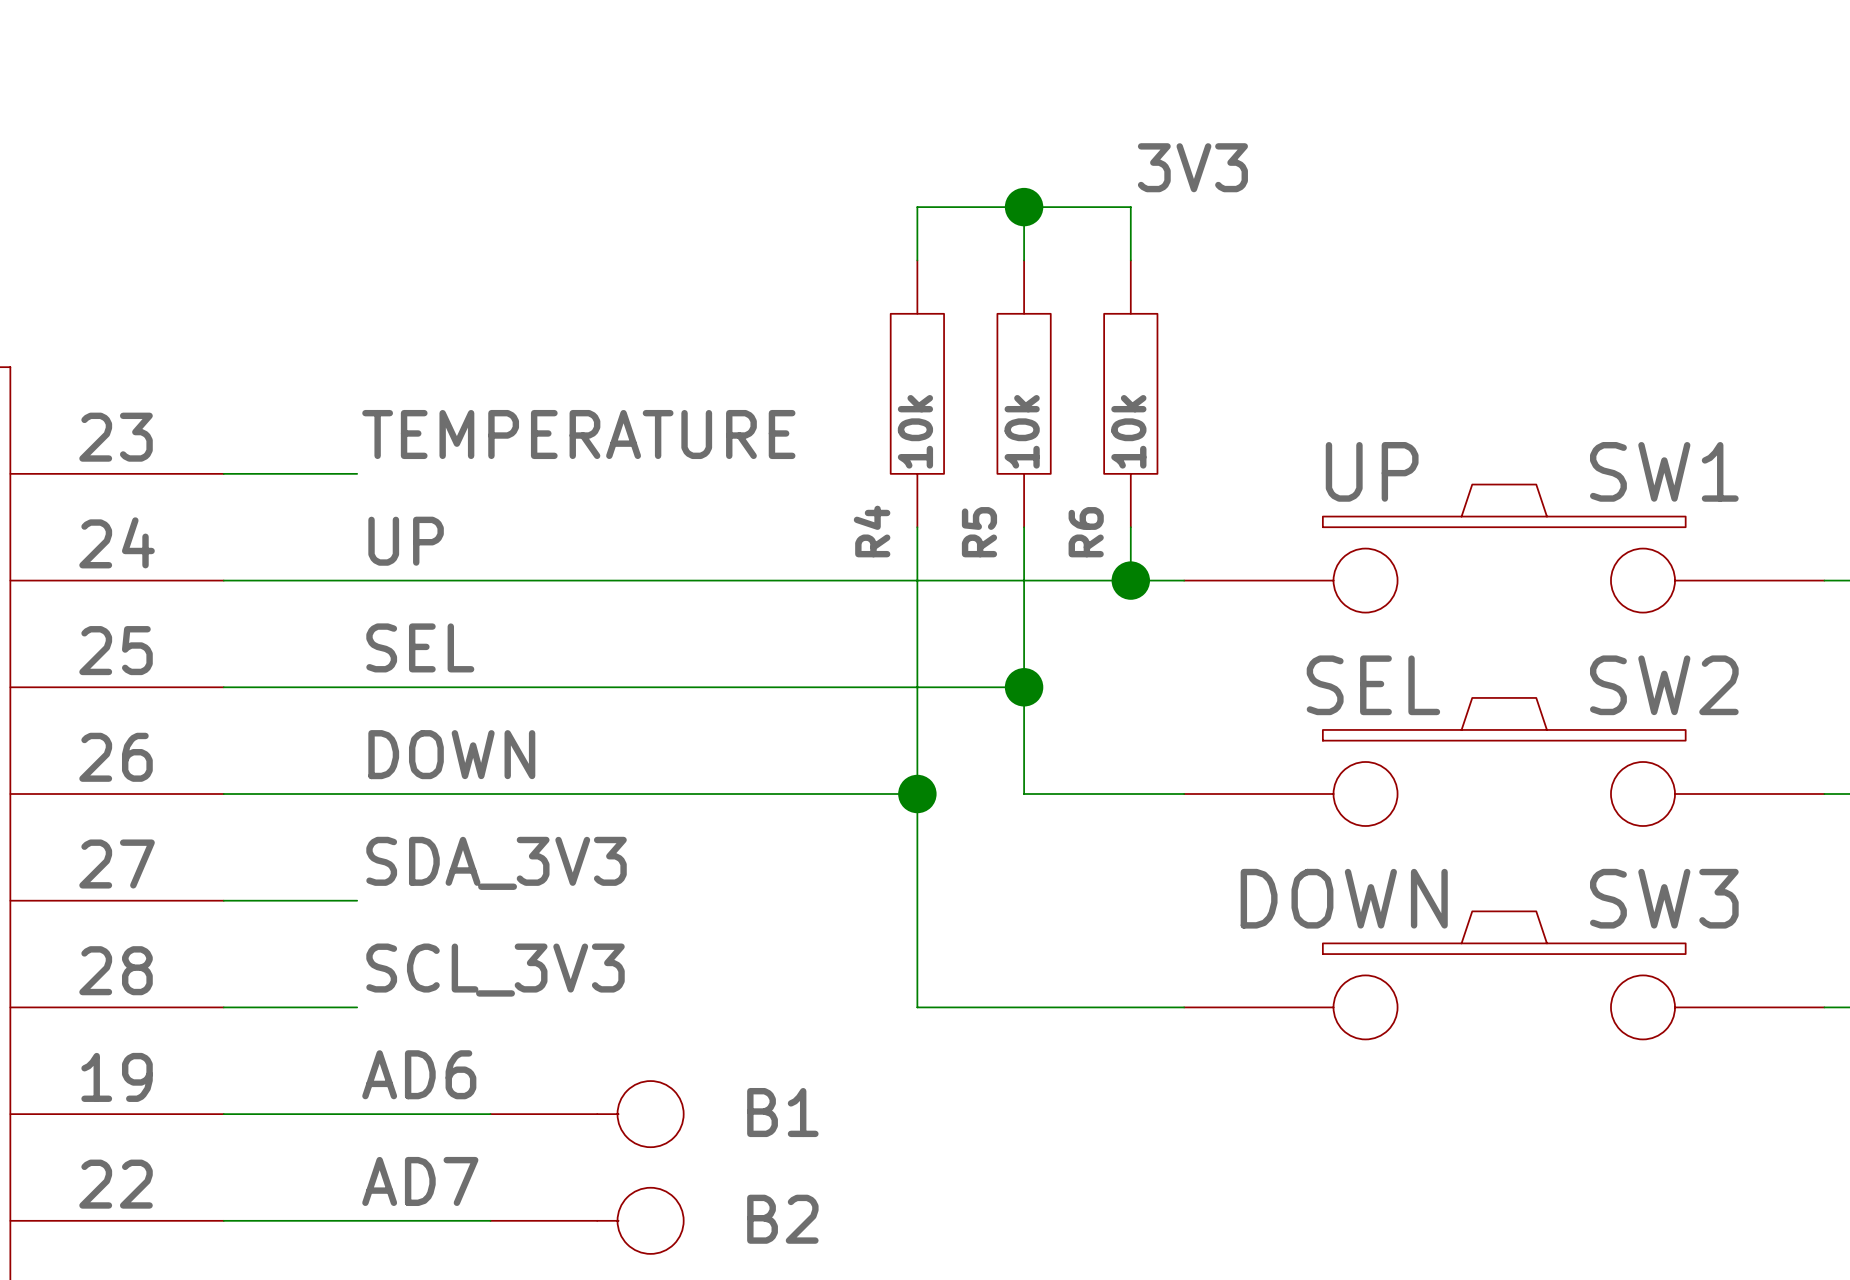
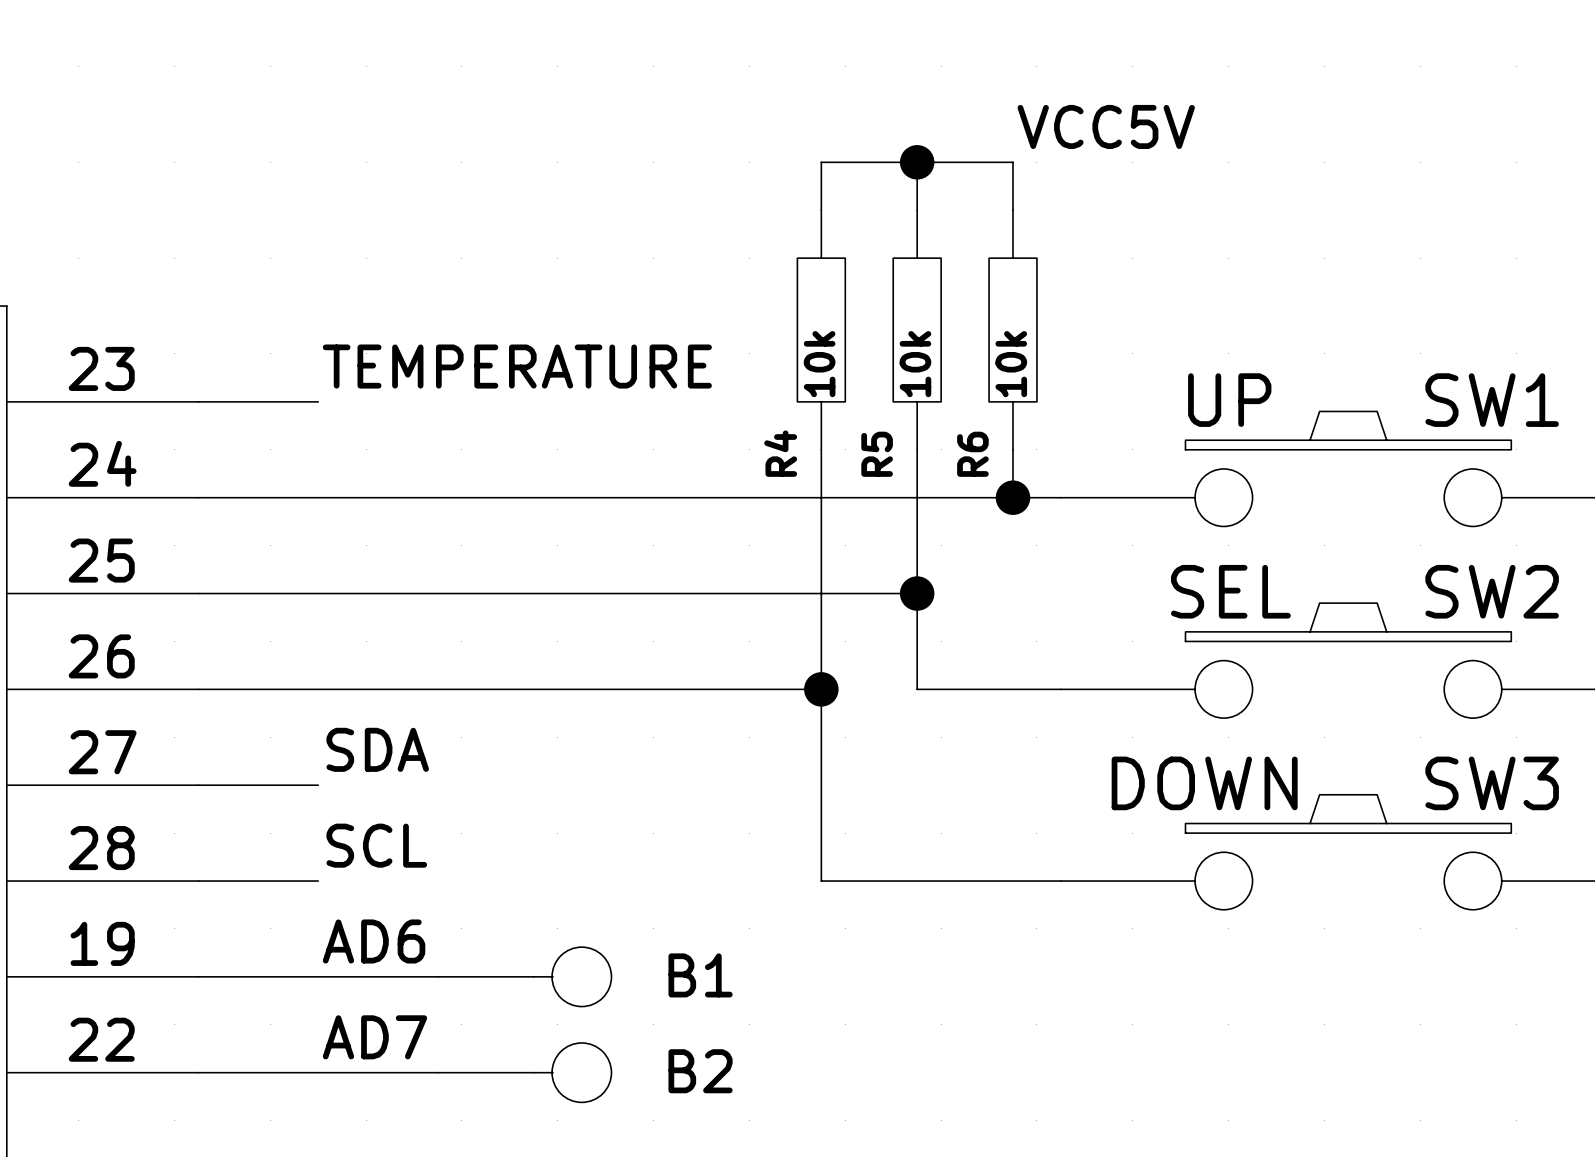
label: 3V3 (1192, 167) -> VCC5V (1106, 126)
label: UP (406, 541) -> none
label: SEL (420, 647) -> none
label: DOWN (451, 754) -> none
label: SDA_3V3 (496, 863) -> SDA (377, 749)
label: SCL_3V3 (495, 970) -> SCL (376, 845)

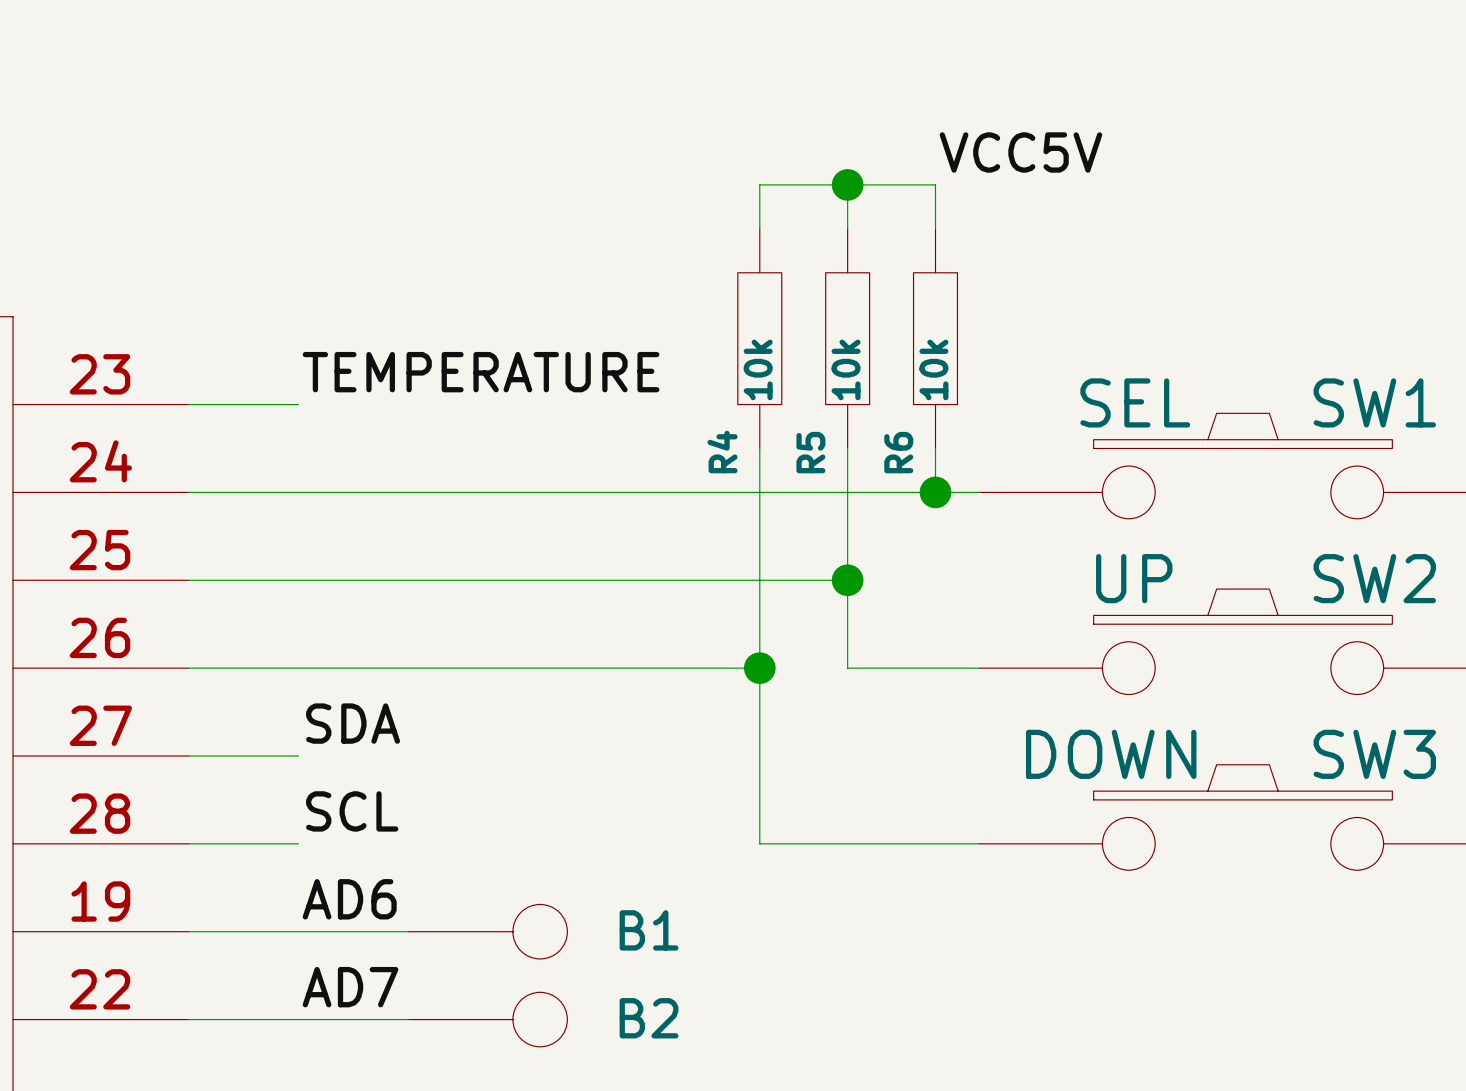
SW1 value: UP (1229, 400) -> SEL (1135, 402)
SW2 value: SEL (1230, 591) -> UP (1134, 578)

